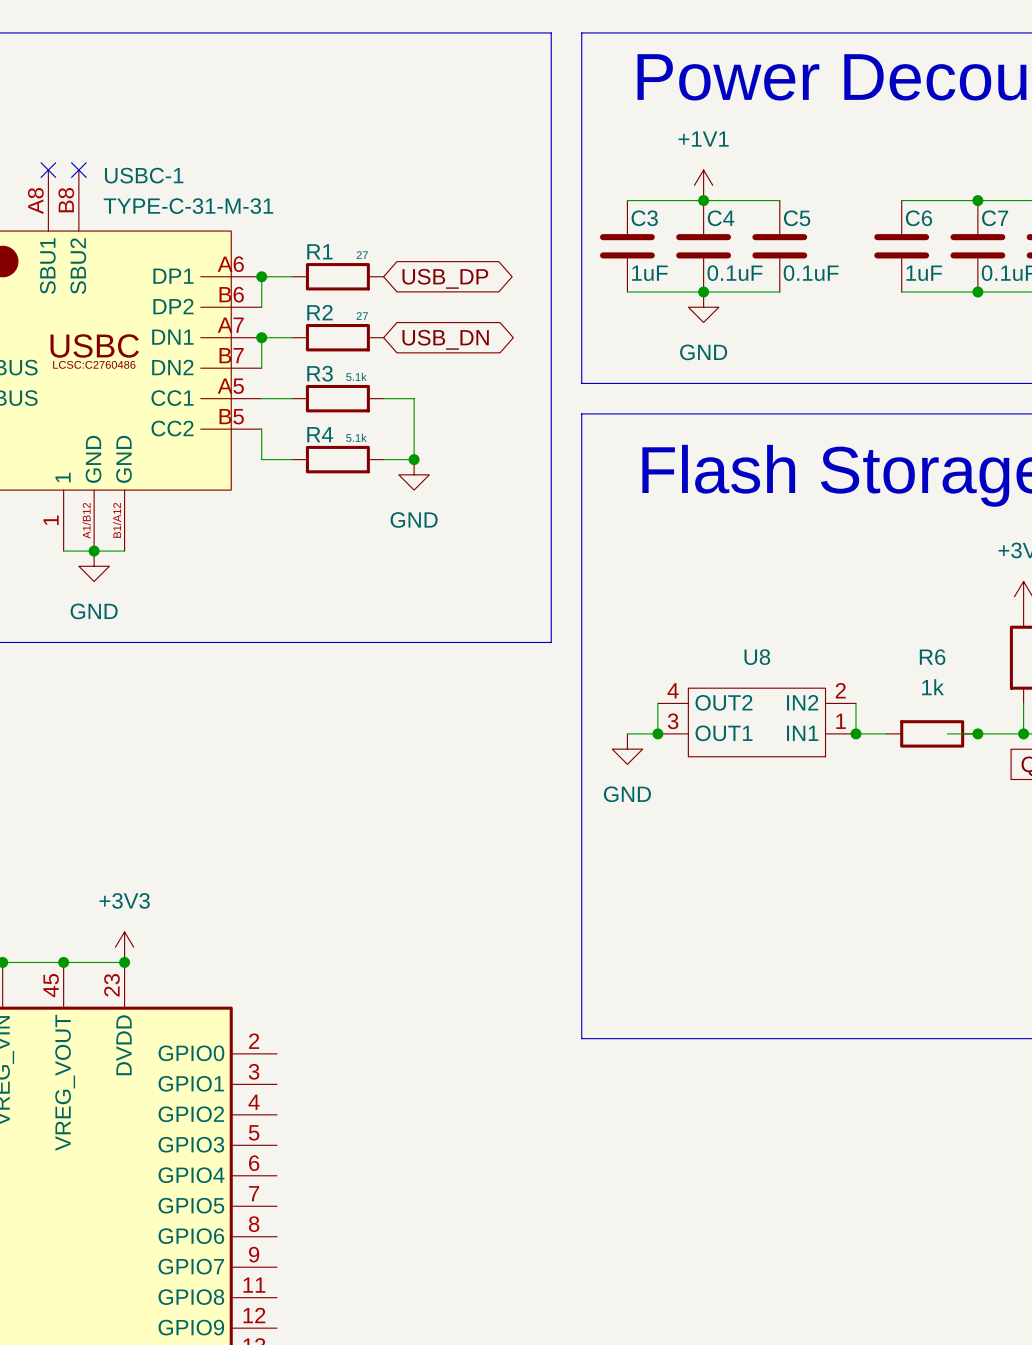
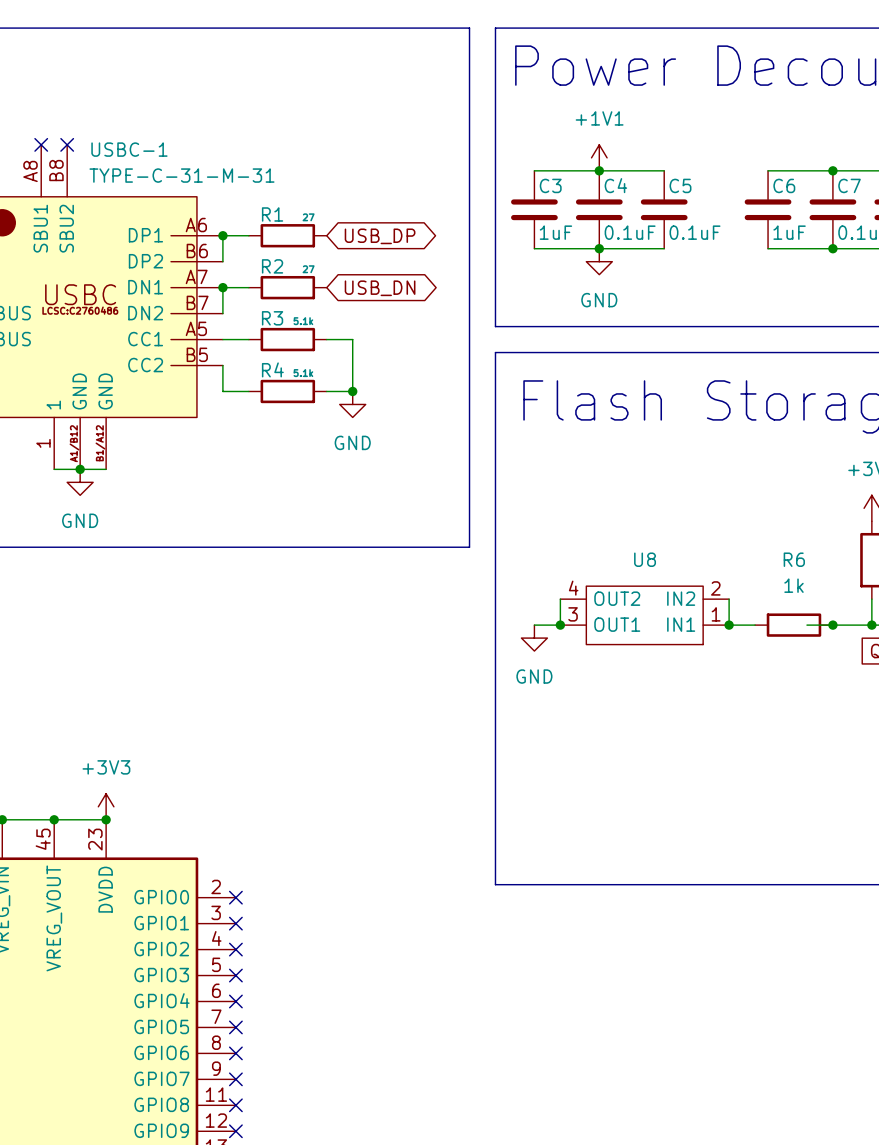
no-connect mark: none -> (235, 897)
no-connect mark: none -> (235, 923)
no-connect mark: none -> (235, 949)
no-connect mark: none -> (235, 975)
no-connect mark: none -> (235, 1001)
no-connect mark: none -> (235, 1027)
no-connect mark: none -> (235, 1053)
no-connect mark: none -> (235, 1079)
no-connect mark: none -> (235, 1105)
no-connect mark: none -> (235, 1131)

